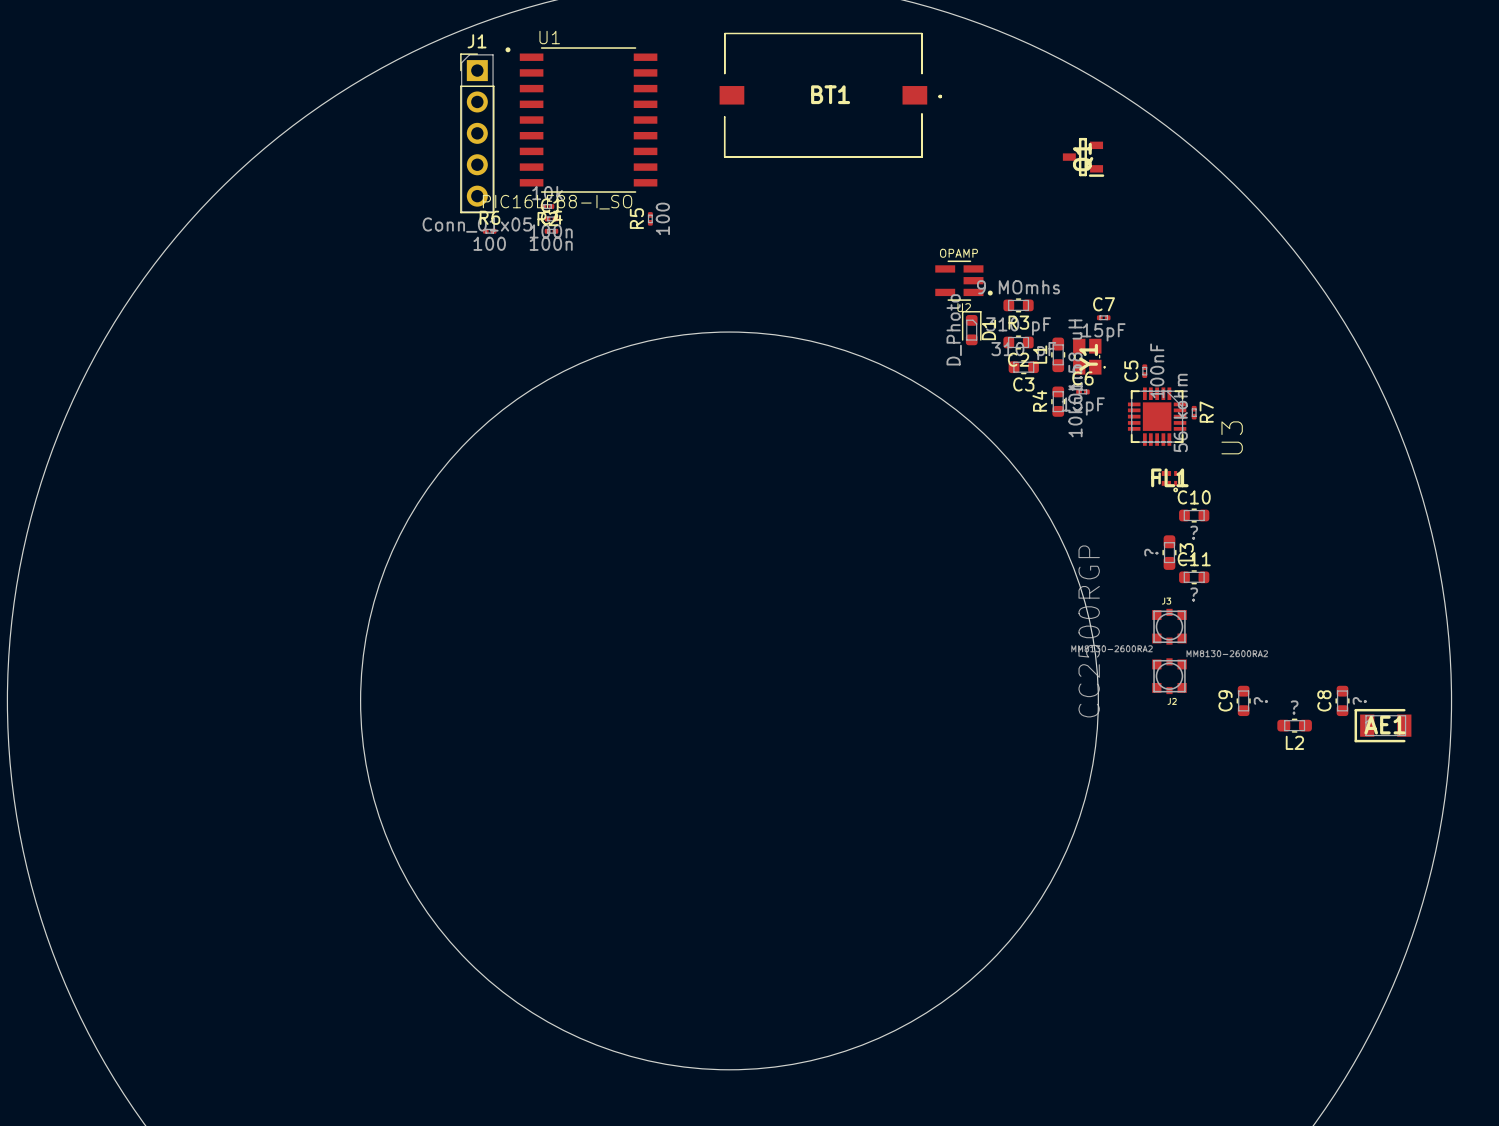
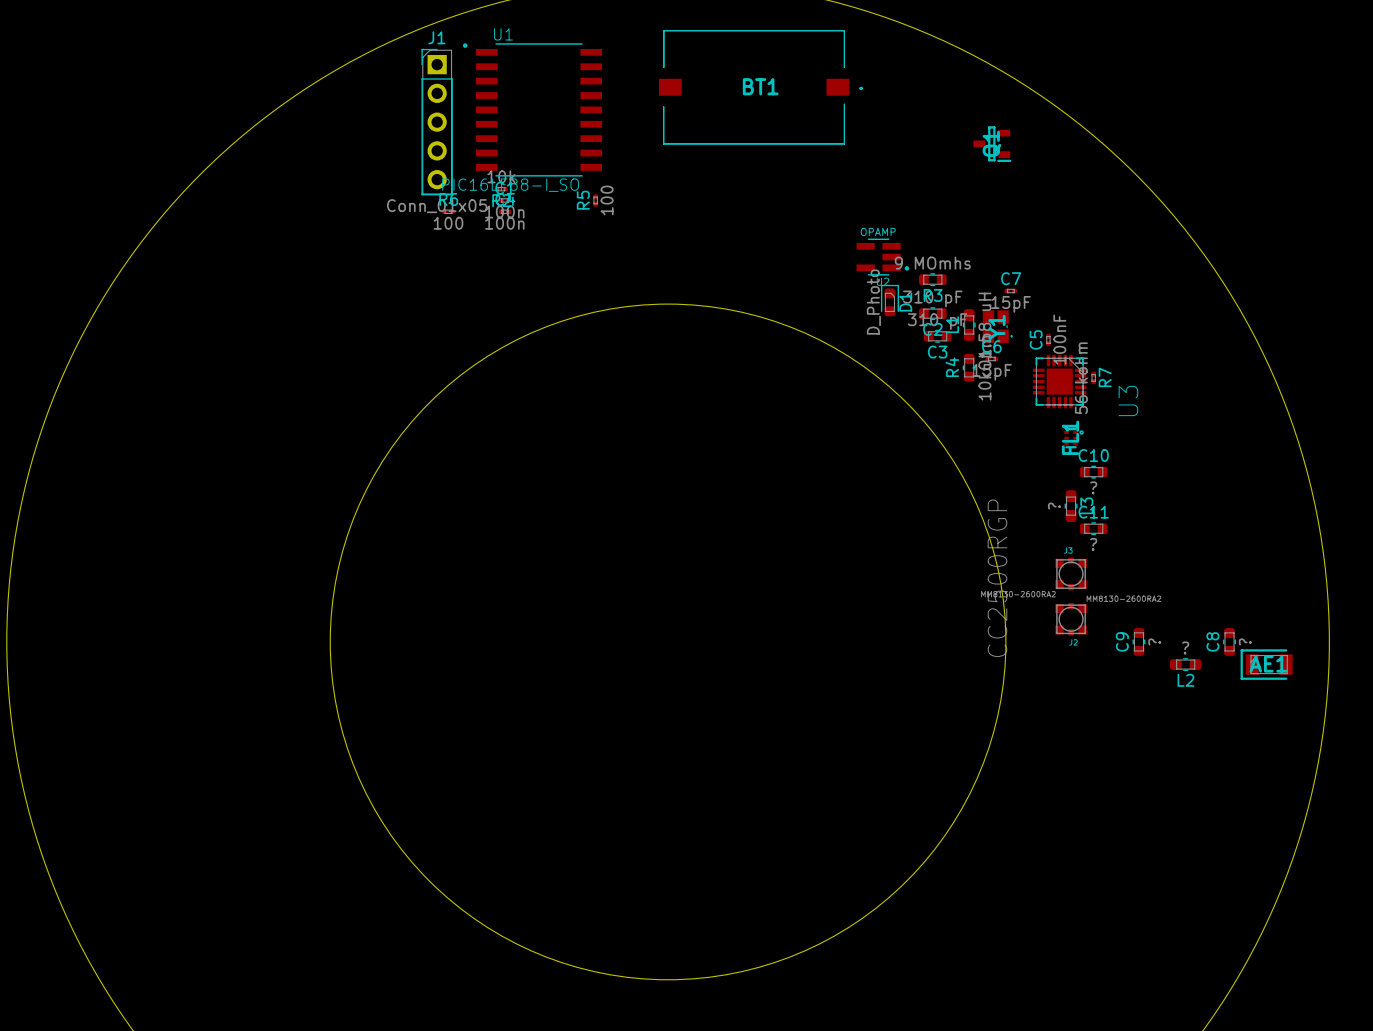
FL1 rotation: 0° (1169, 481) -> 90° counterclockwise (1074, 438)

